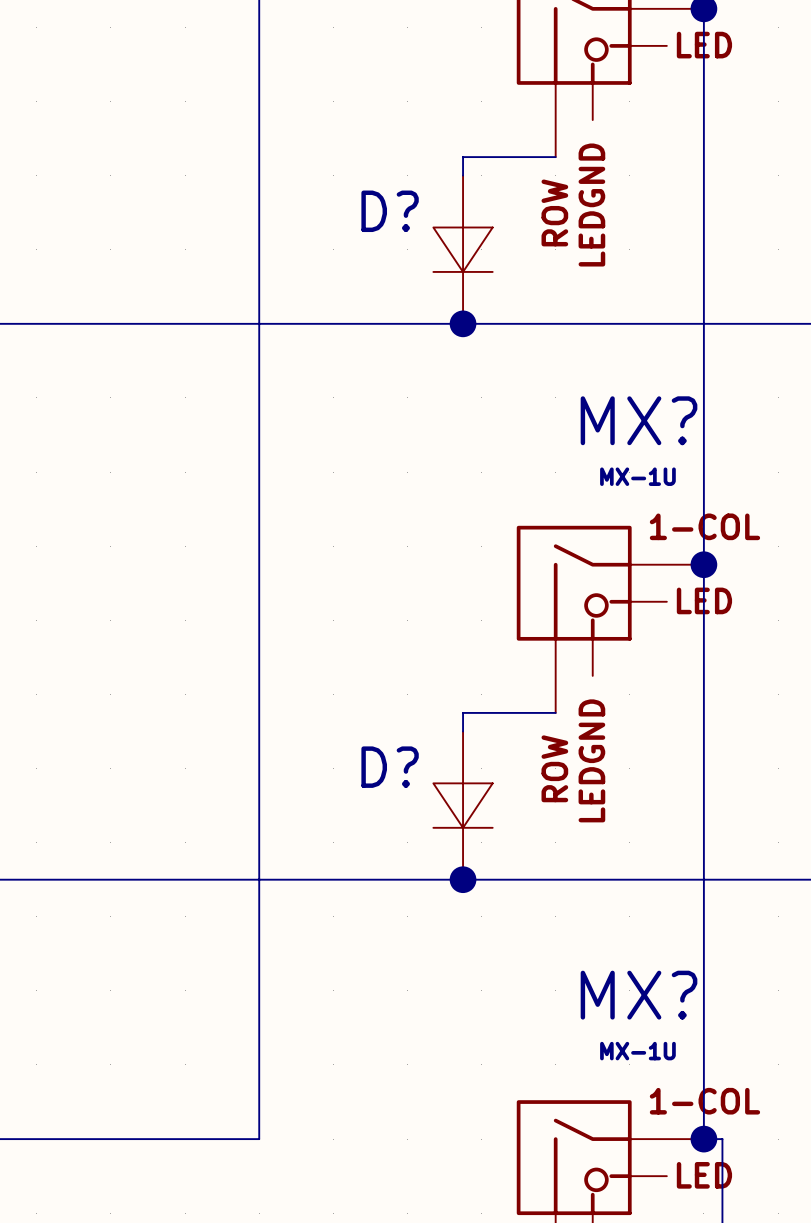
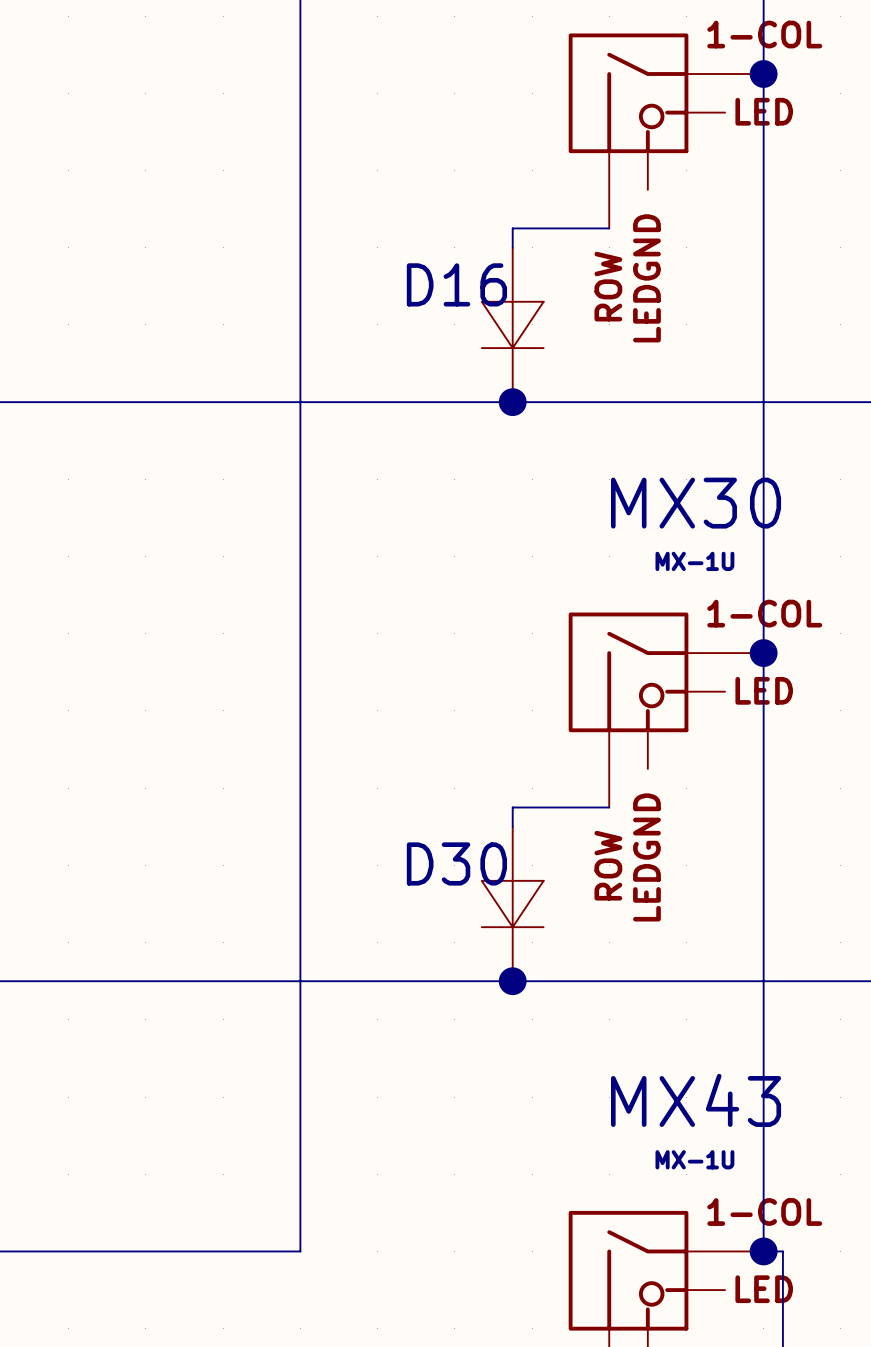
D? name: D? (390, 211) -> D16 (456, 284)
MX? name: MX? (639, 420) -> MX30 (696, 503)
D? name: D? (390, 767) -> D30 (456, 863)
MX? name: MX? (639, 995) -> MX43 (696, 1100)

